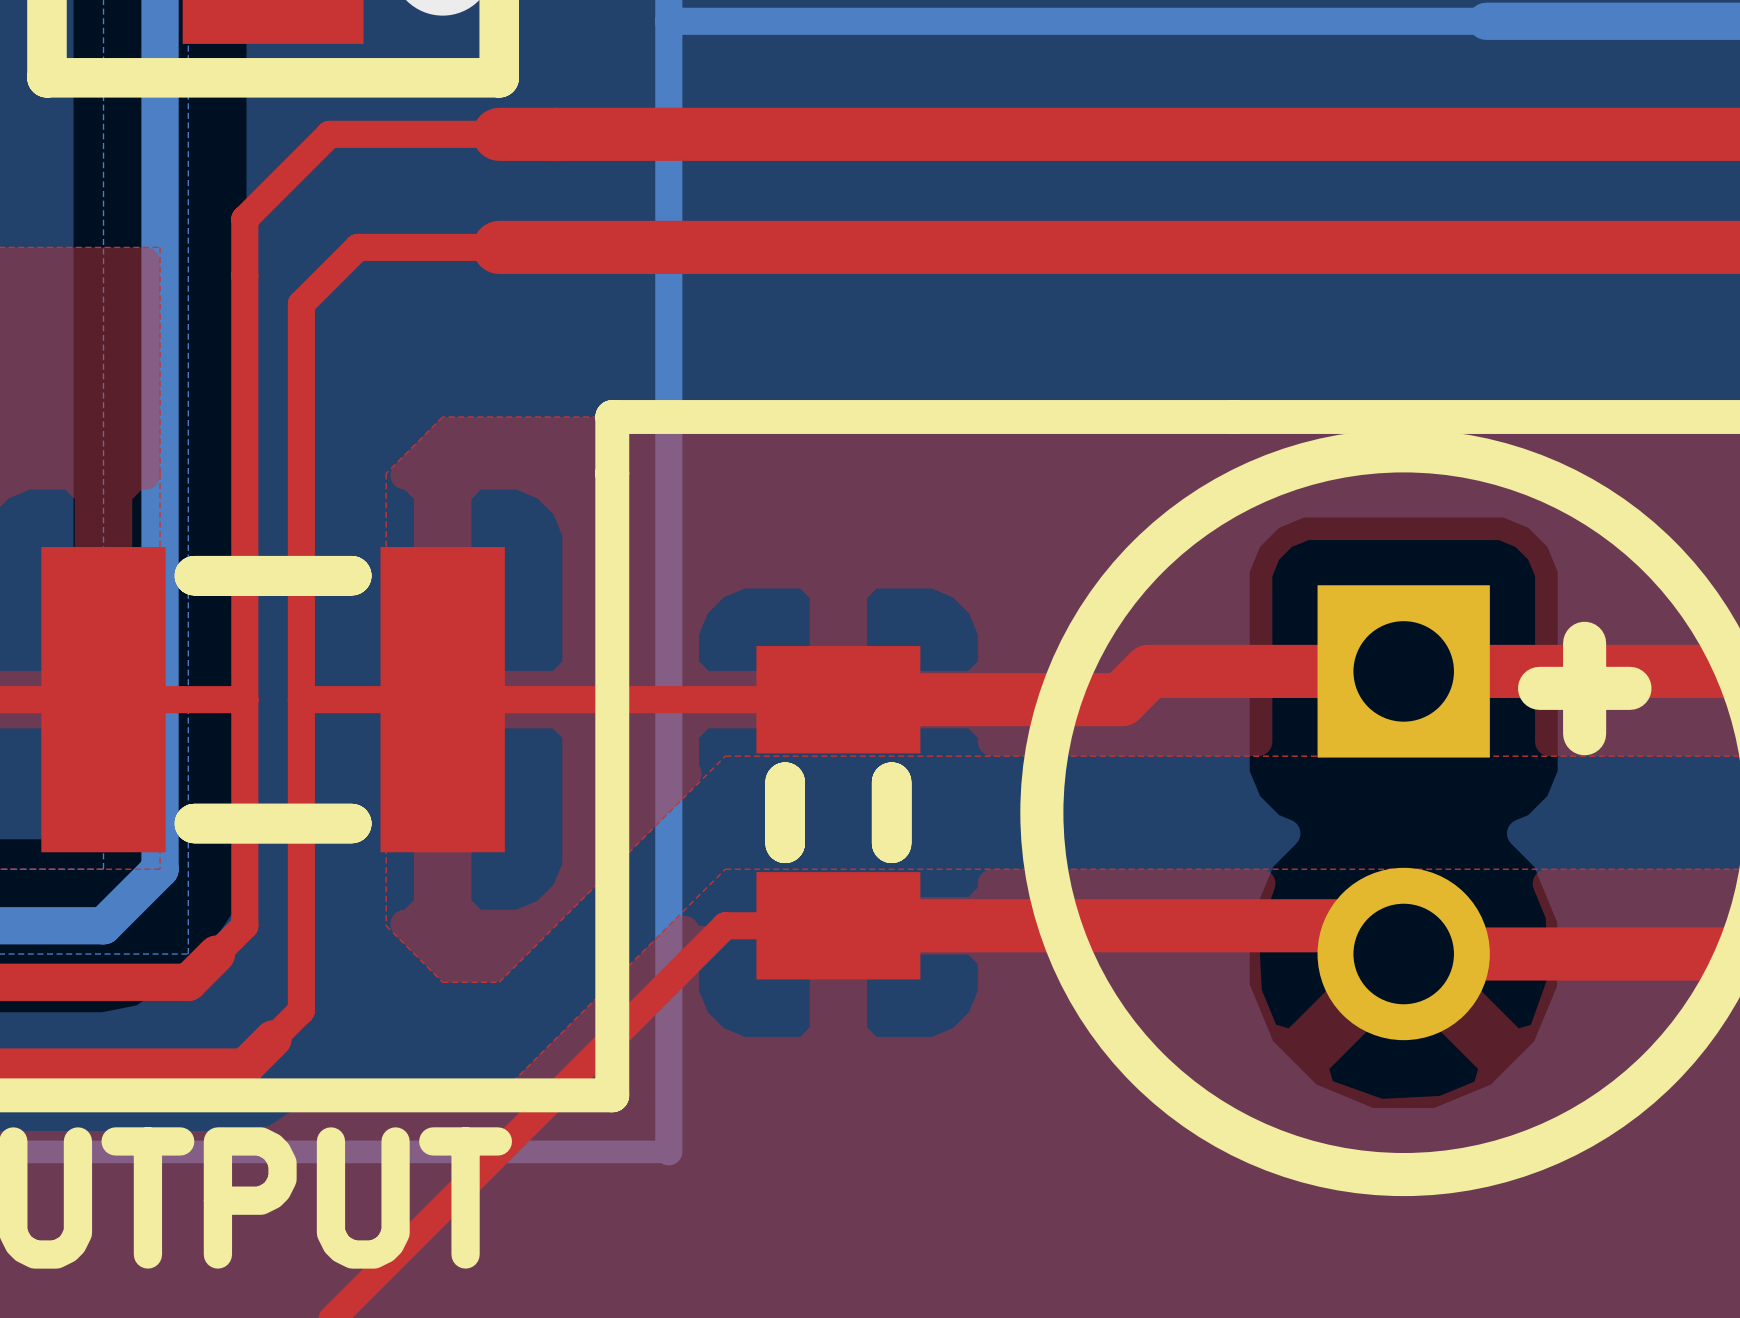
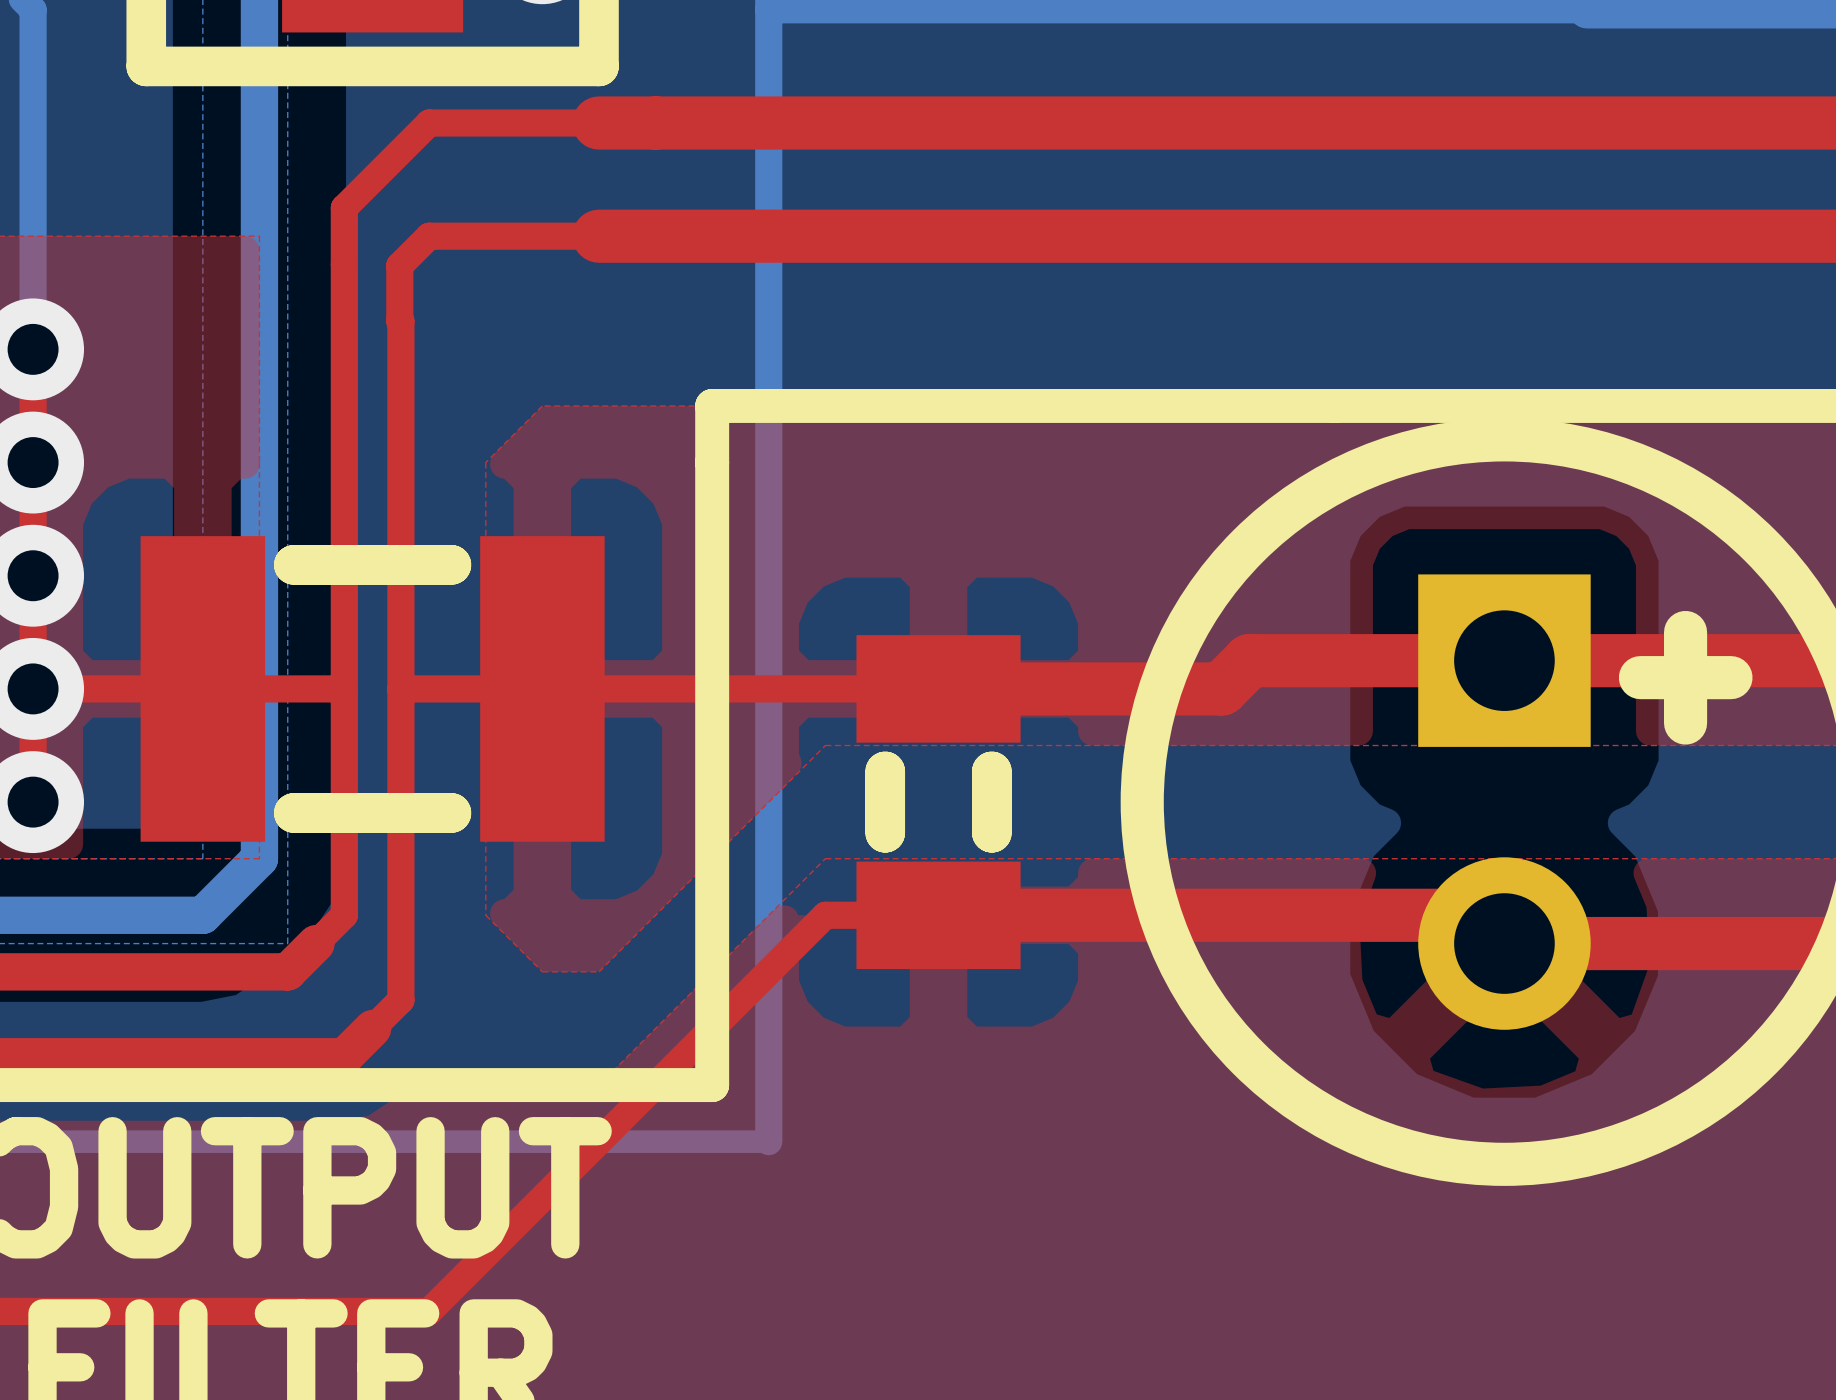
top track: (357, 247) (301, 303) (301, 332) -> (457, 236) (429, 236) (399, 265) (399, 321)

